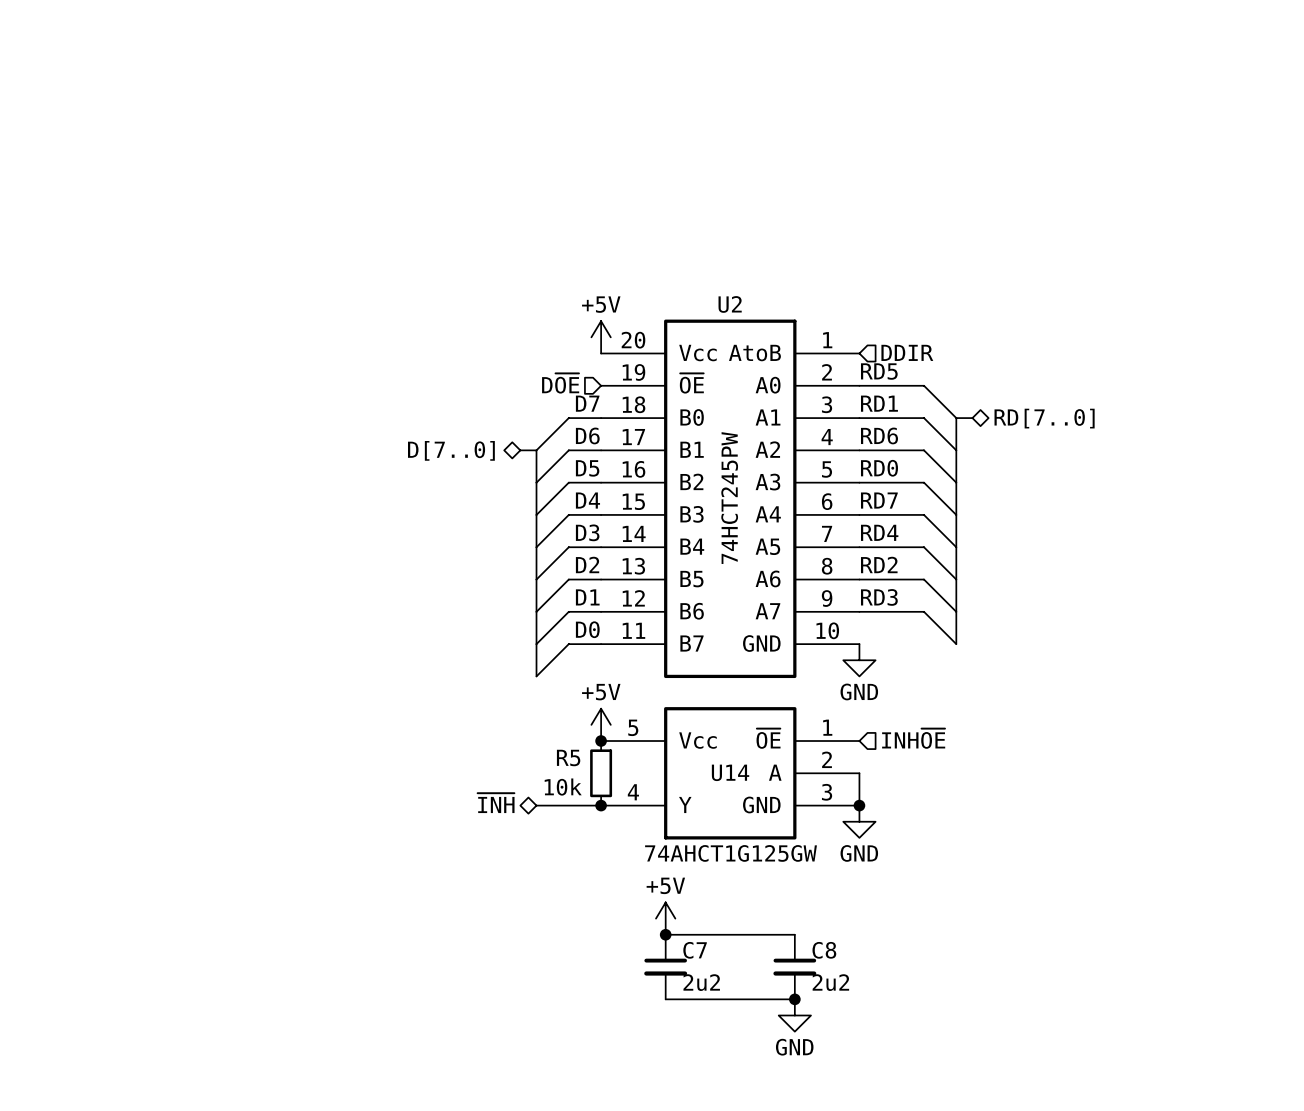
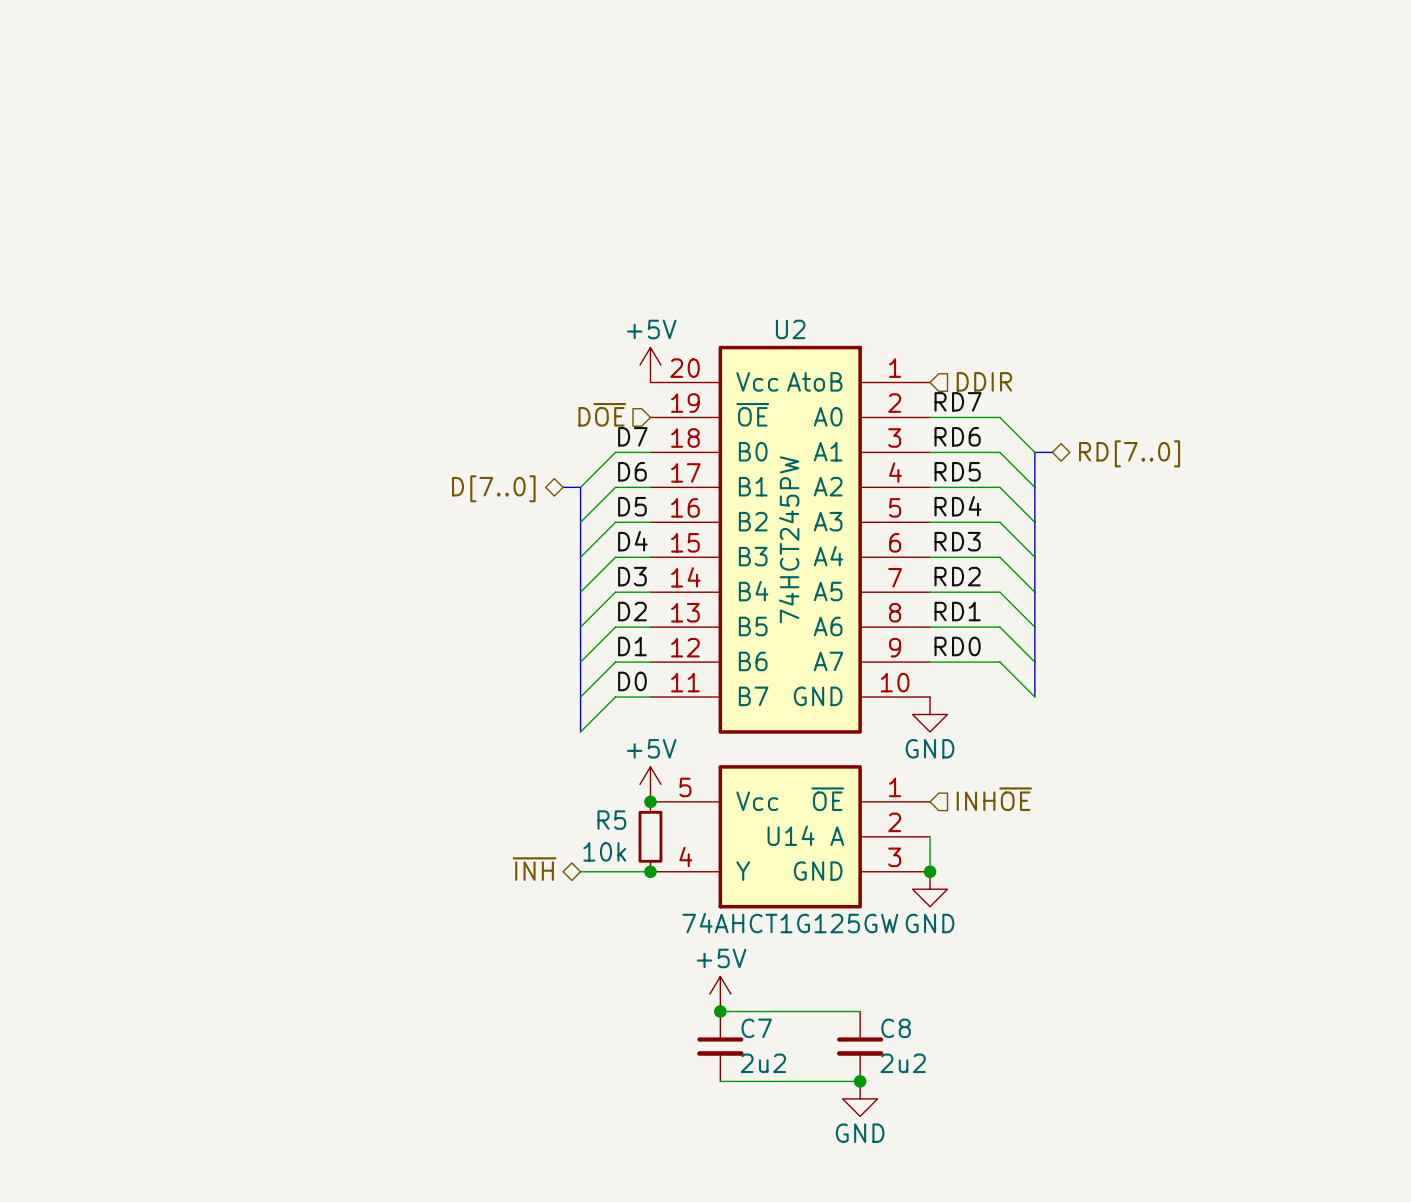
label: RD5 (879, 371) -> RD7 (958, 401)
label: RD1 (879, 403) -> RD6 (957, 436)
label: RD6 (879, 435) -> RD5 (957, 471)
label: RD0 (879, 468) -> RD4 (958, 506)
label: RD7 (879, 500) -> RD3 (957, 541)
label: RD4 (879, 532) -> RD2 (957, 576)
label: RD2 (879, 564) -> RD1 (957, 611)
label: RD3 (879, 597) -> RD0 (957, 646)

